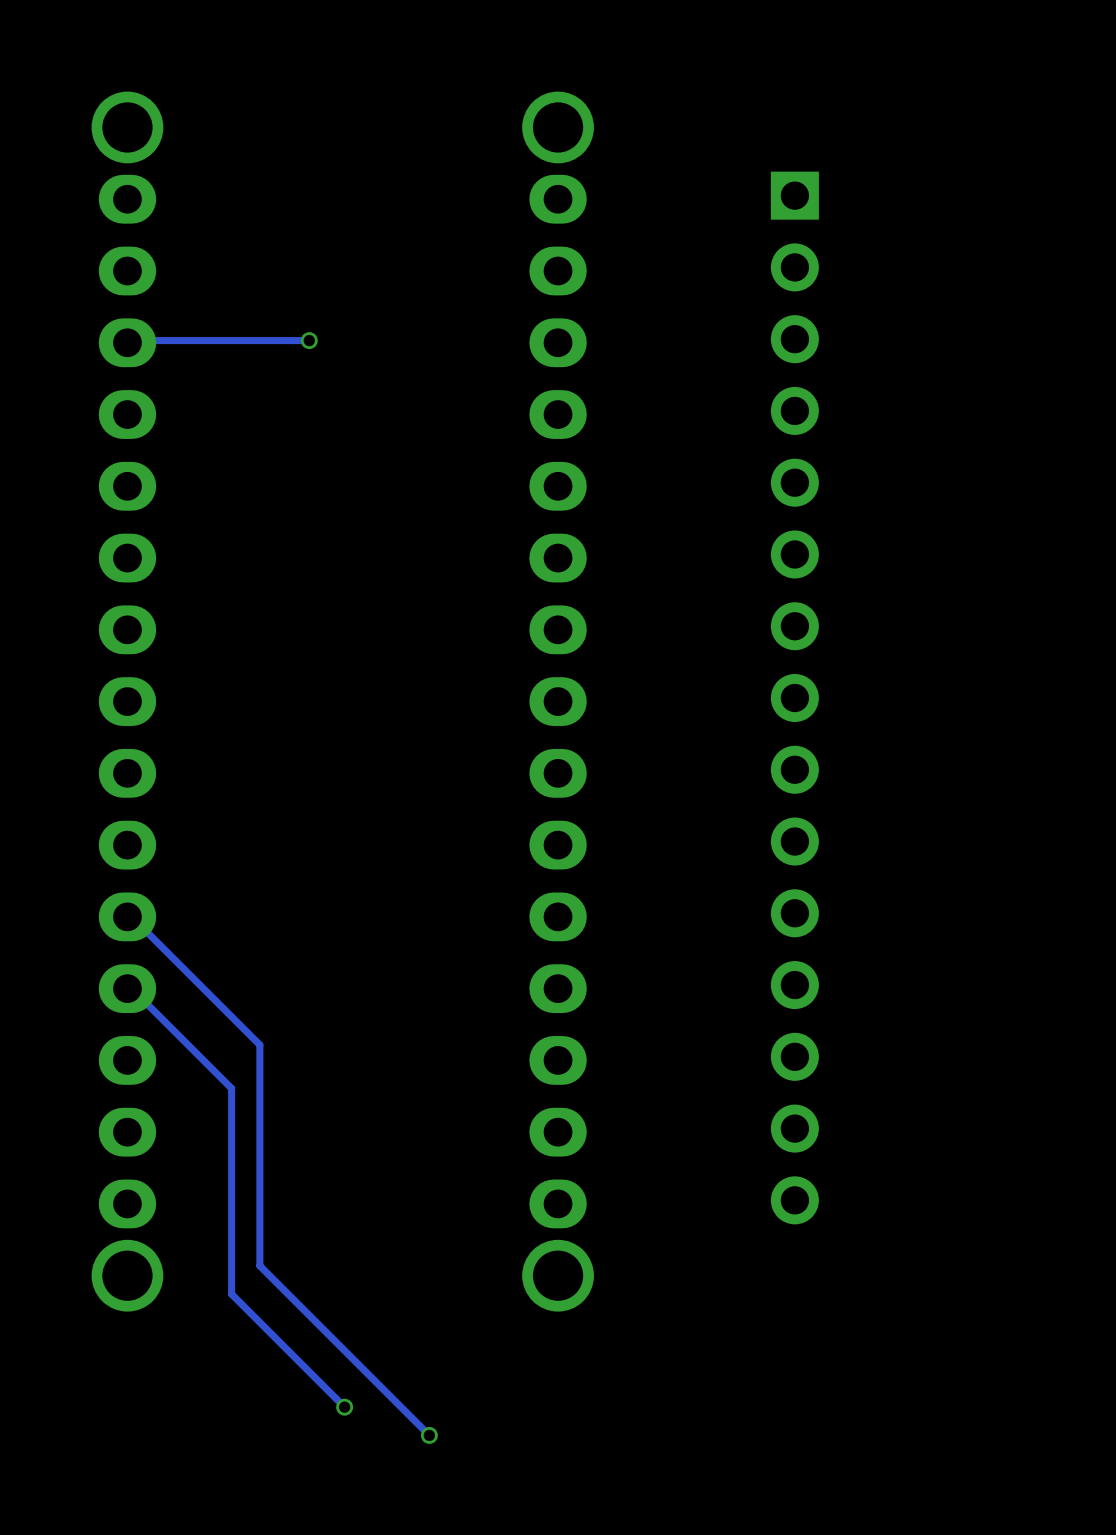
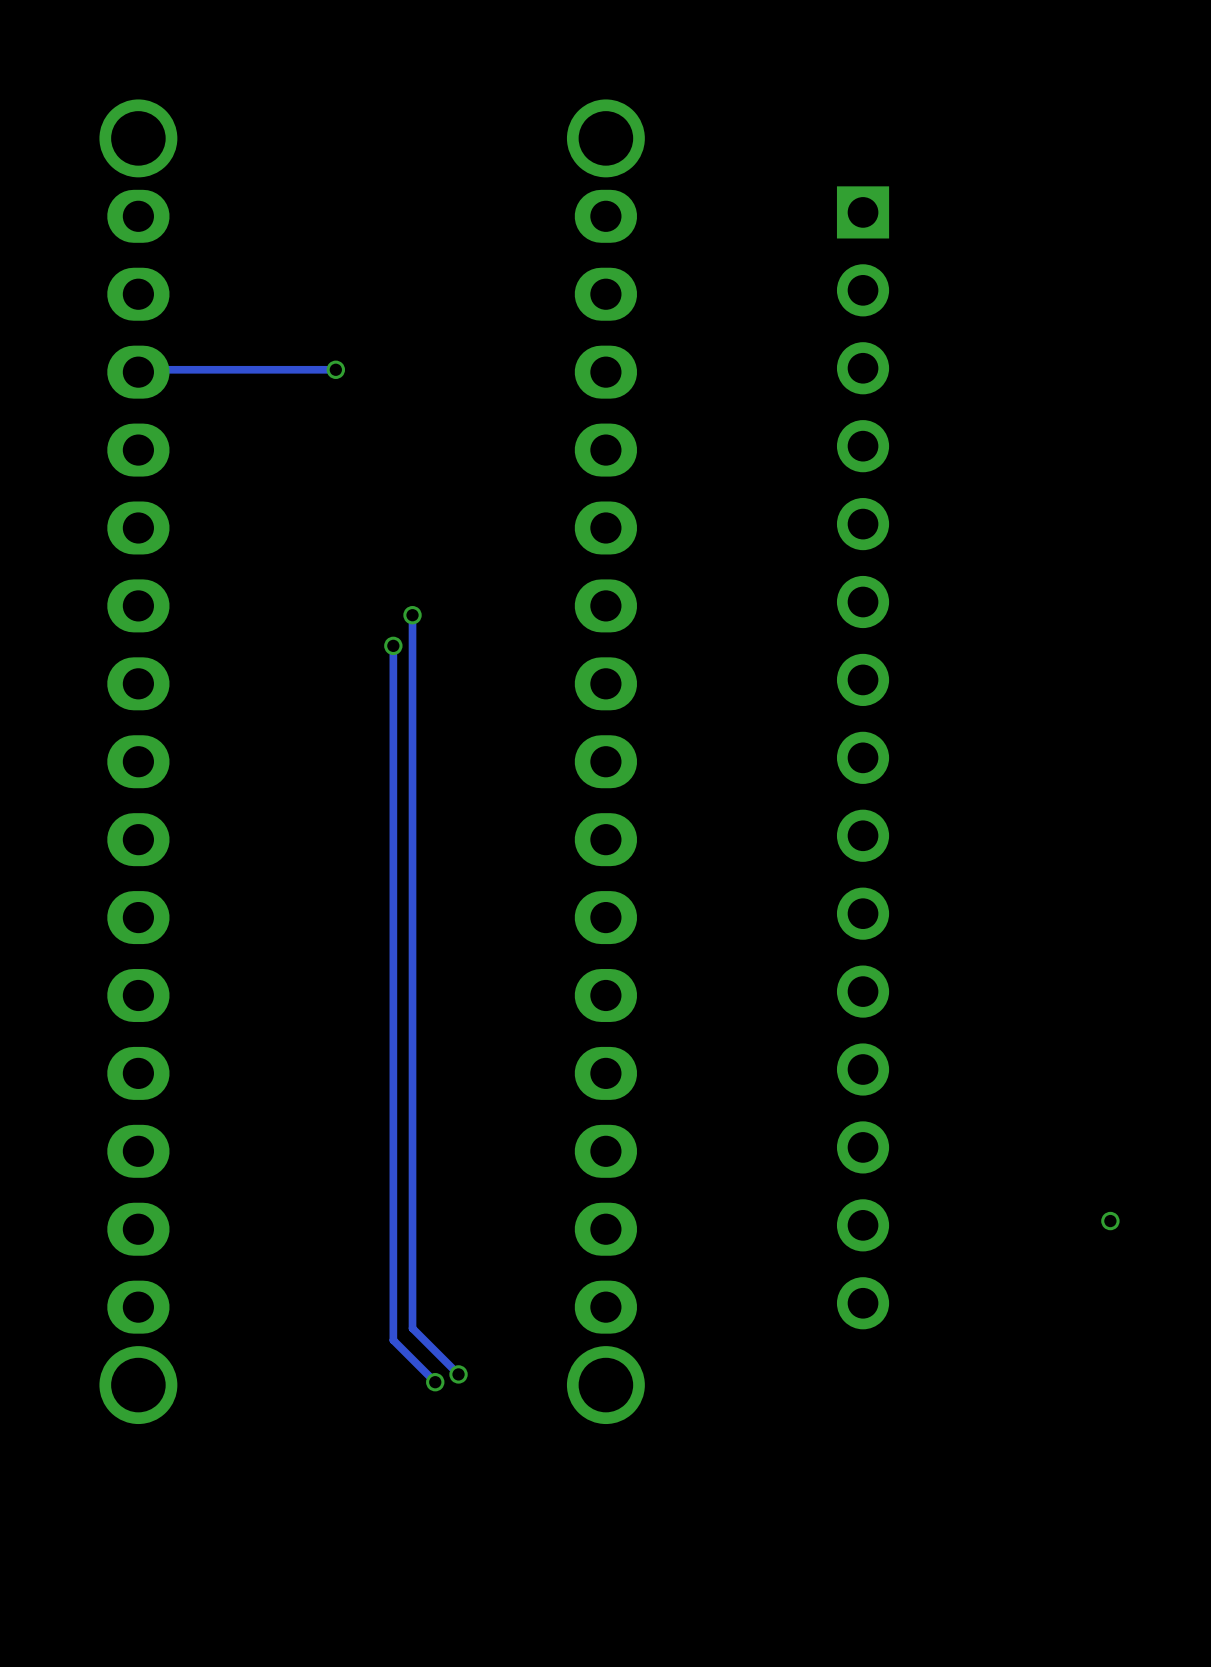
track: none -> (412, 615) (412, 1328) (458, 1374)
via: none -> (412, 615)
track: none -> (393, 645) (393, 1340) (435, 1382)
via: none -> (393, 645)
track: (127, 916) (131, 916) (259, 1044) (259, 1265) (429, 1435) -> none
track: (127, 988) (131, 988) (231, 1088) (231, 1294) (344, 1407) -> none
via: none -> (1110, 1221)
via: none -> (458, 1374)
via: none -> (435, 1382)
via: (344, 1407) -> none
via: (429, 1435) -> none

